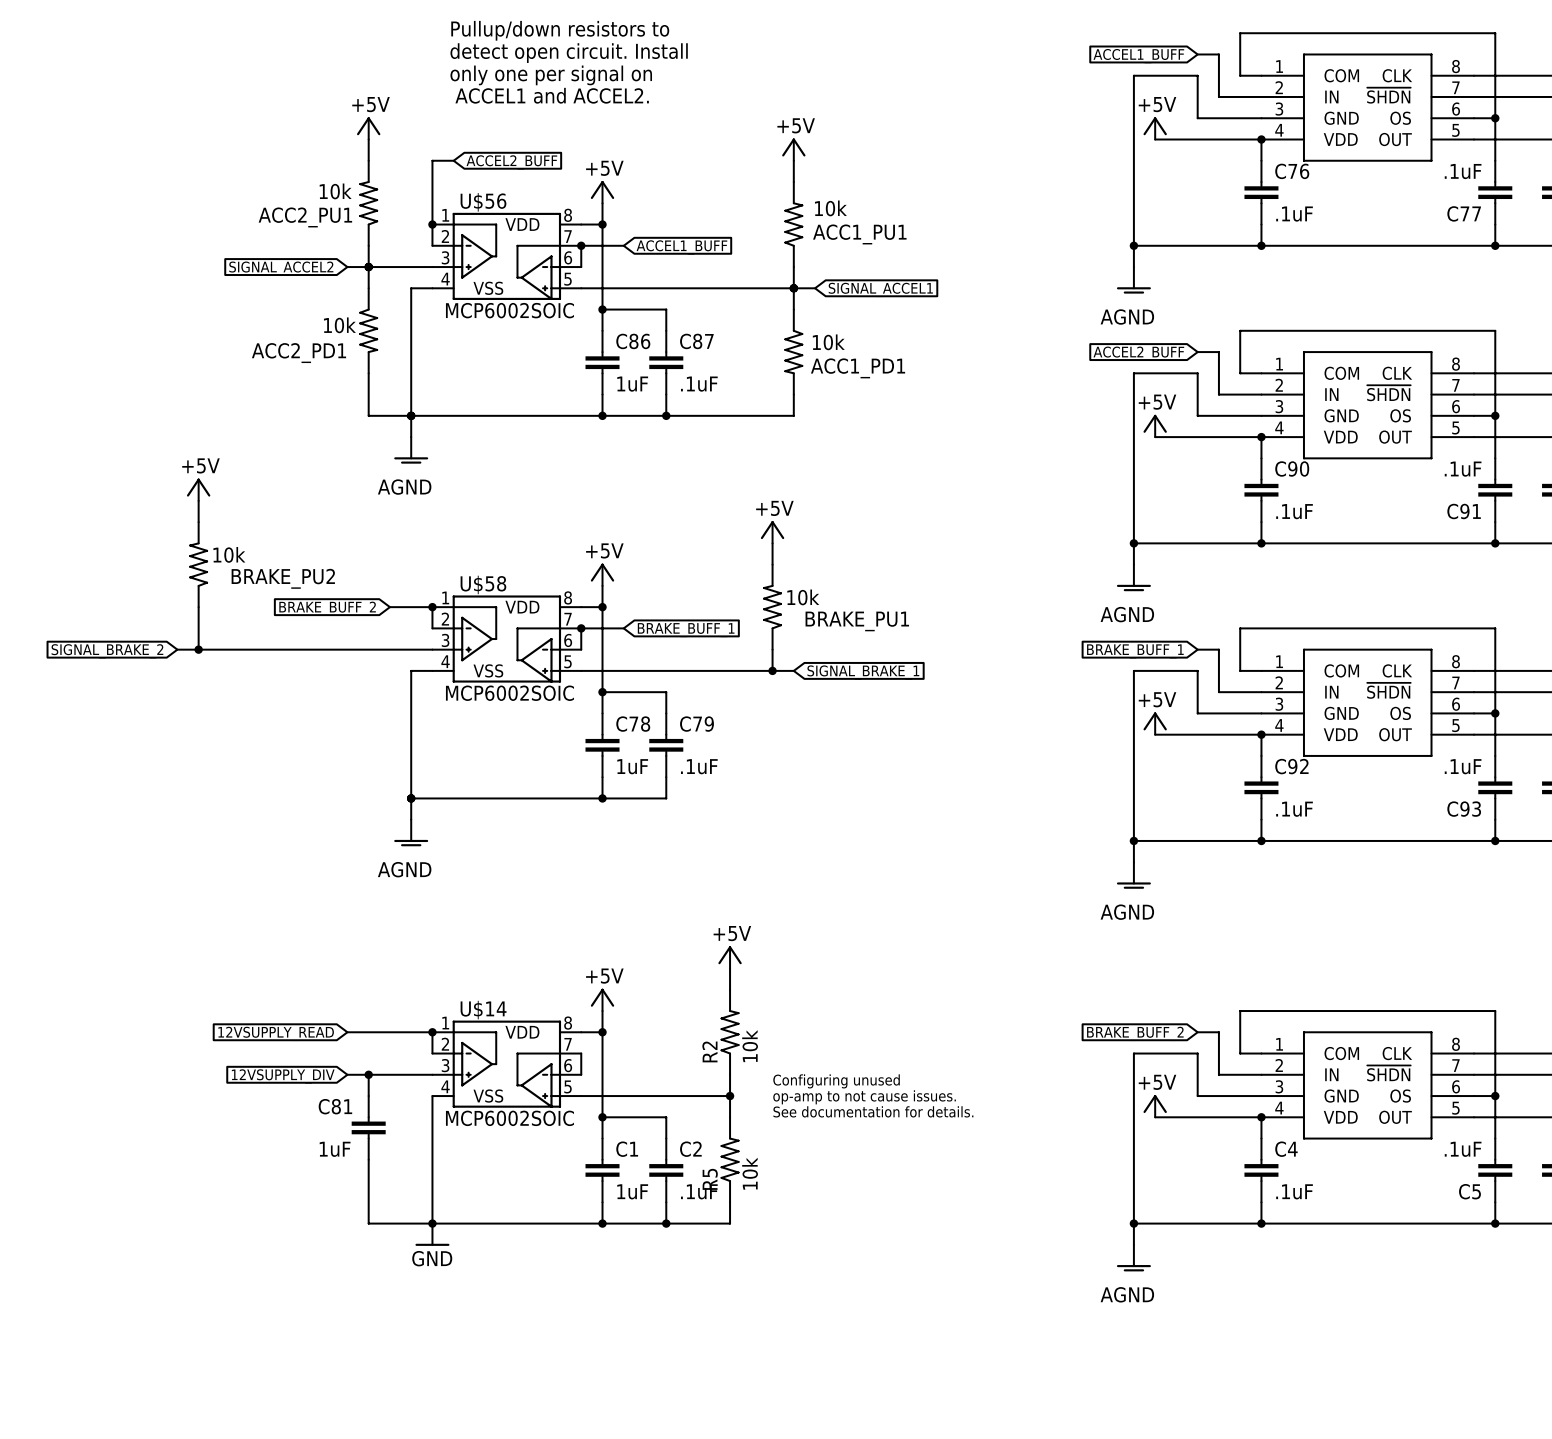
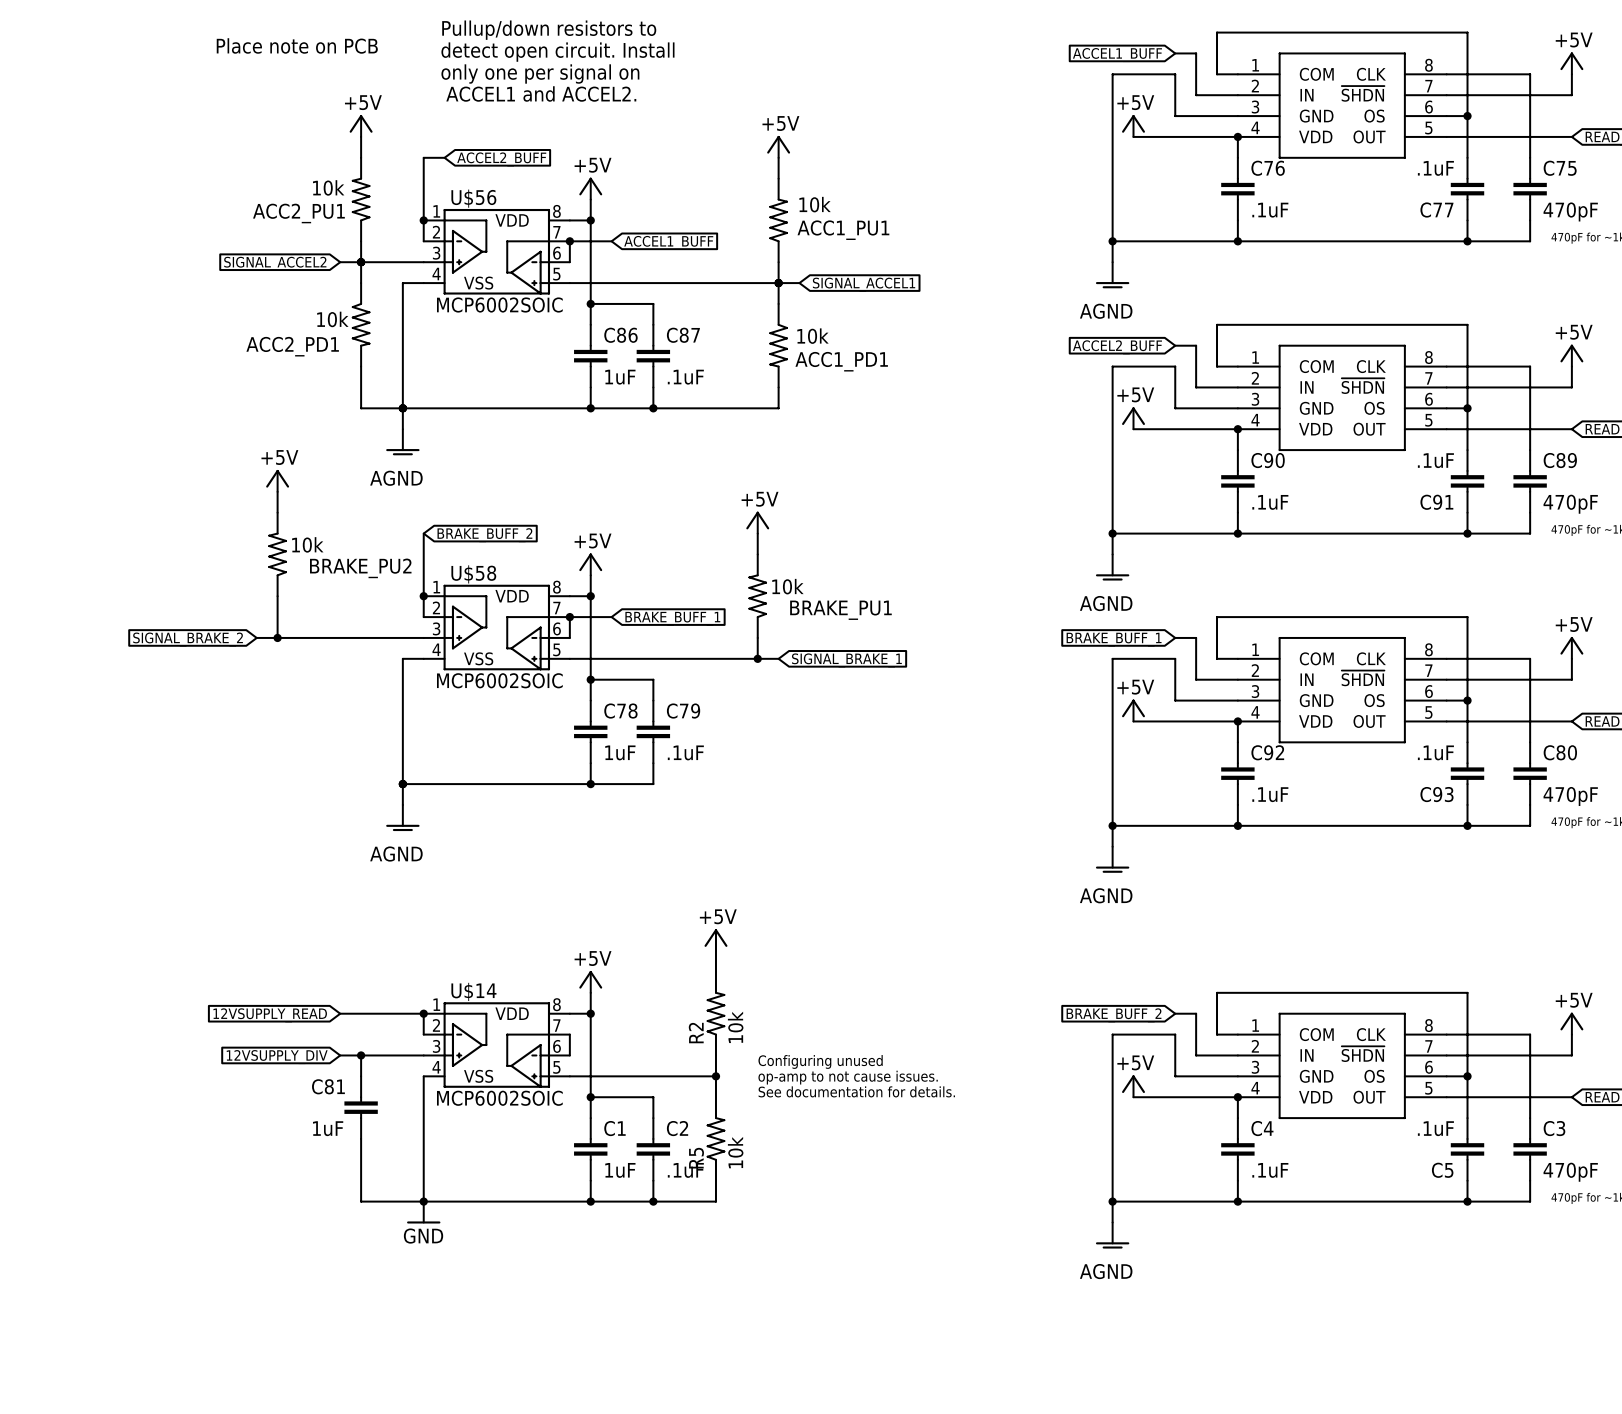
text: none -> Place note on PCB (297, 45)
power symbol position: +5V (198, 489) -> +5V (277, 480)
wire: (198, 500) (198, 522) -> (277, 491) (277, 512)
BRAKE_PU2 position: (198, 564) -> (277, 554)
wire: (198, 607) (198, 649) -> (277, 596) (277, 637)
wire: (389, 607) (432, 607) -> (423, 533) (423, 596)
global label rotation: 0° (327, 608) -> 180° (484, 535)
global label position: BRAKE_BUFF_2 (327, 608) -> BRAKE_BUFF_2 (484, 535)
wire: (177, 649) (262, 649) -> none
junction: (198, 649) -> none
junction: none -> (277, 637)
global label position: SIGNAL_BRAKE_2 (107, 651) -> SIGNAL_BRAKE_2 (188, 639)

